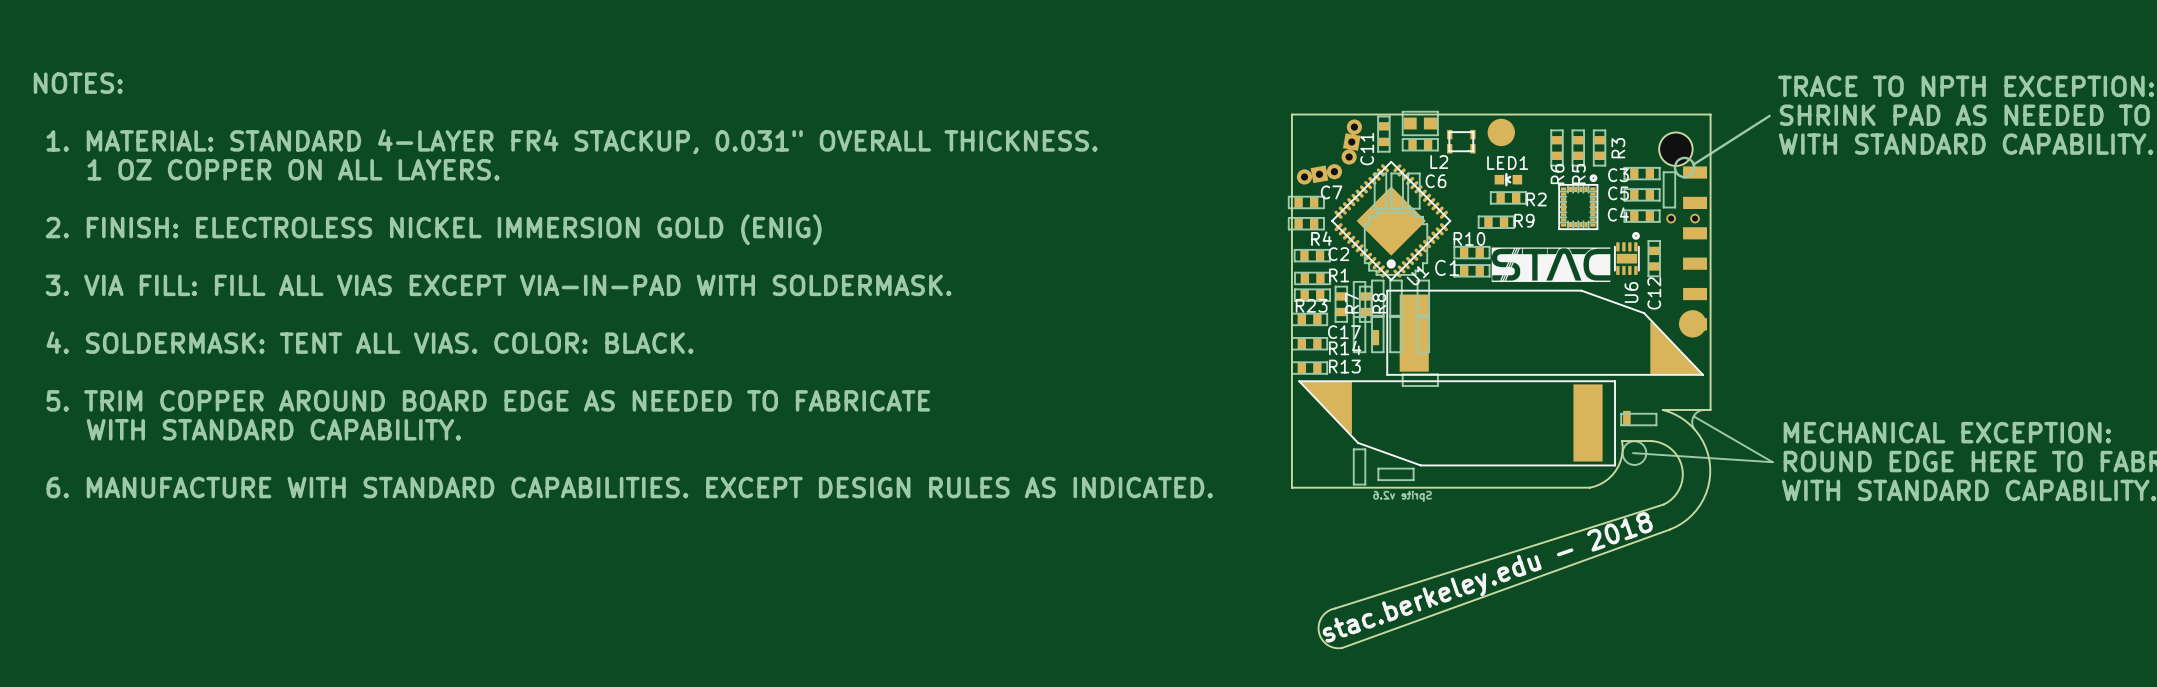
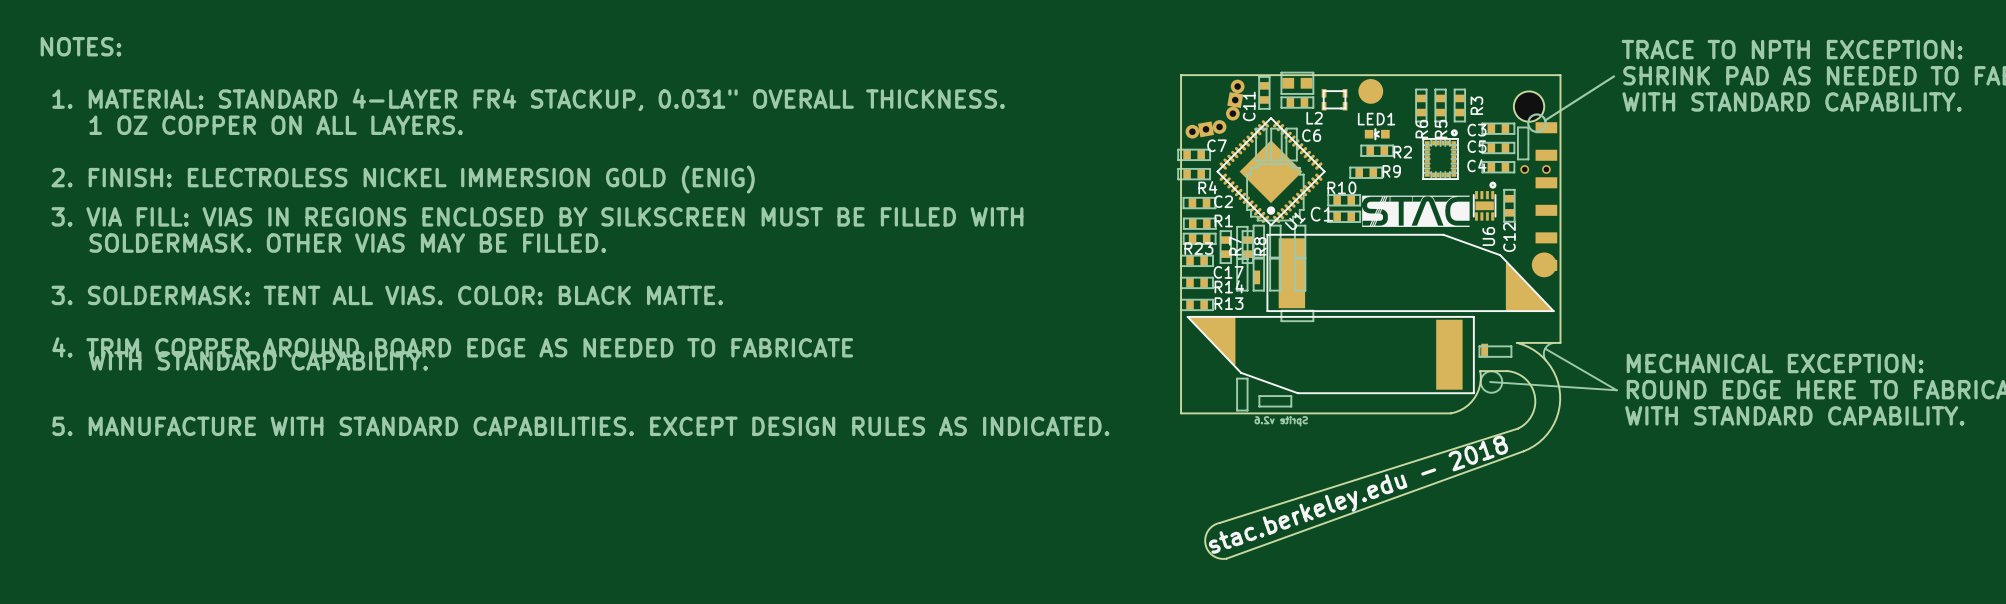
text: none -> 3. VIA FILL: VIAS IN REGIONS ENCLOSED BY SILKSCREEN MUST BE FILLED WITH (537, 216)
text: 3. VIA FILL: FILL ALL VIAS EXCEPT VIA-IN-PAD WITH SOLDERMASK. (498, 285) -> none
text: none -> SOLDERMASK. OTHER VIAS MAY BE FILLED. (347, 243)
text: 4. SOLDERMASK: TENT ALL VIAS. COLOR: BLACK. (370, 342) -> 3. SOLDERMASK: TENT ALL VIAS. COLOR: BLACK MATTE. (387, 295)
text: 5. TRIM COPPER AROUND BOARD EDGE AS NEEDED TO FABRICATE (488, 400) -> 4. TRIM COPPER AROUND BOARD EDGE AS NEEDED TO FABRICATE (452, 347)
text: 6. MANUFACTURE WITH STANDARD CAPABILITIES. EXCEPT DESIGN RULES AS INDICATED. (629, 487) -> 5. MANUFACTURE WITH STANDARD CAPABILITIES. EXCEPT DESIGN RULES AS INDICATED. (580, 426)

